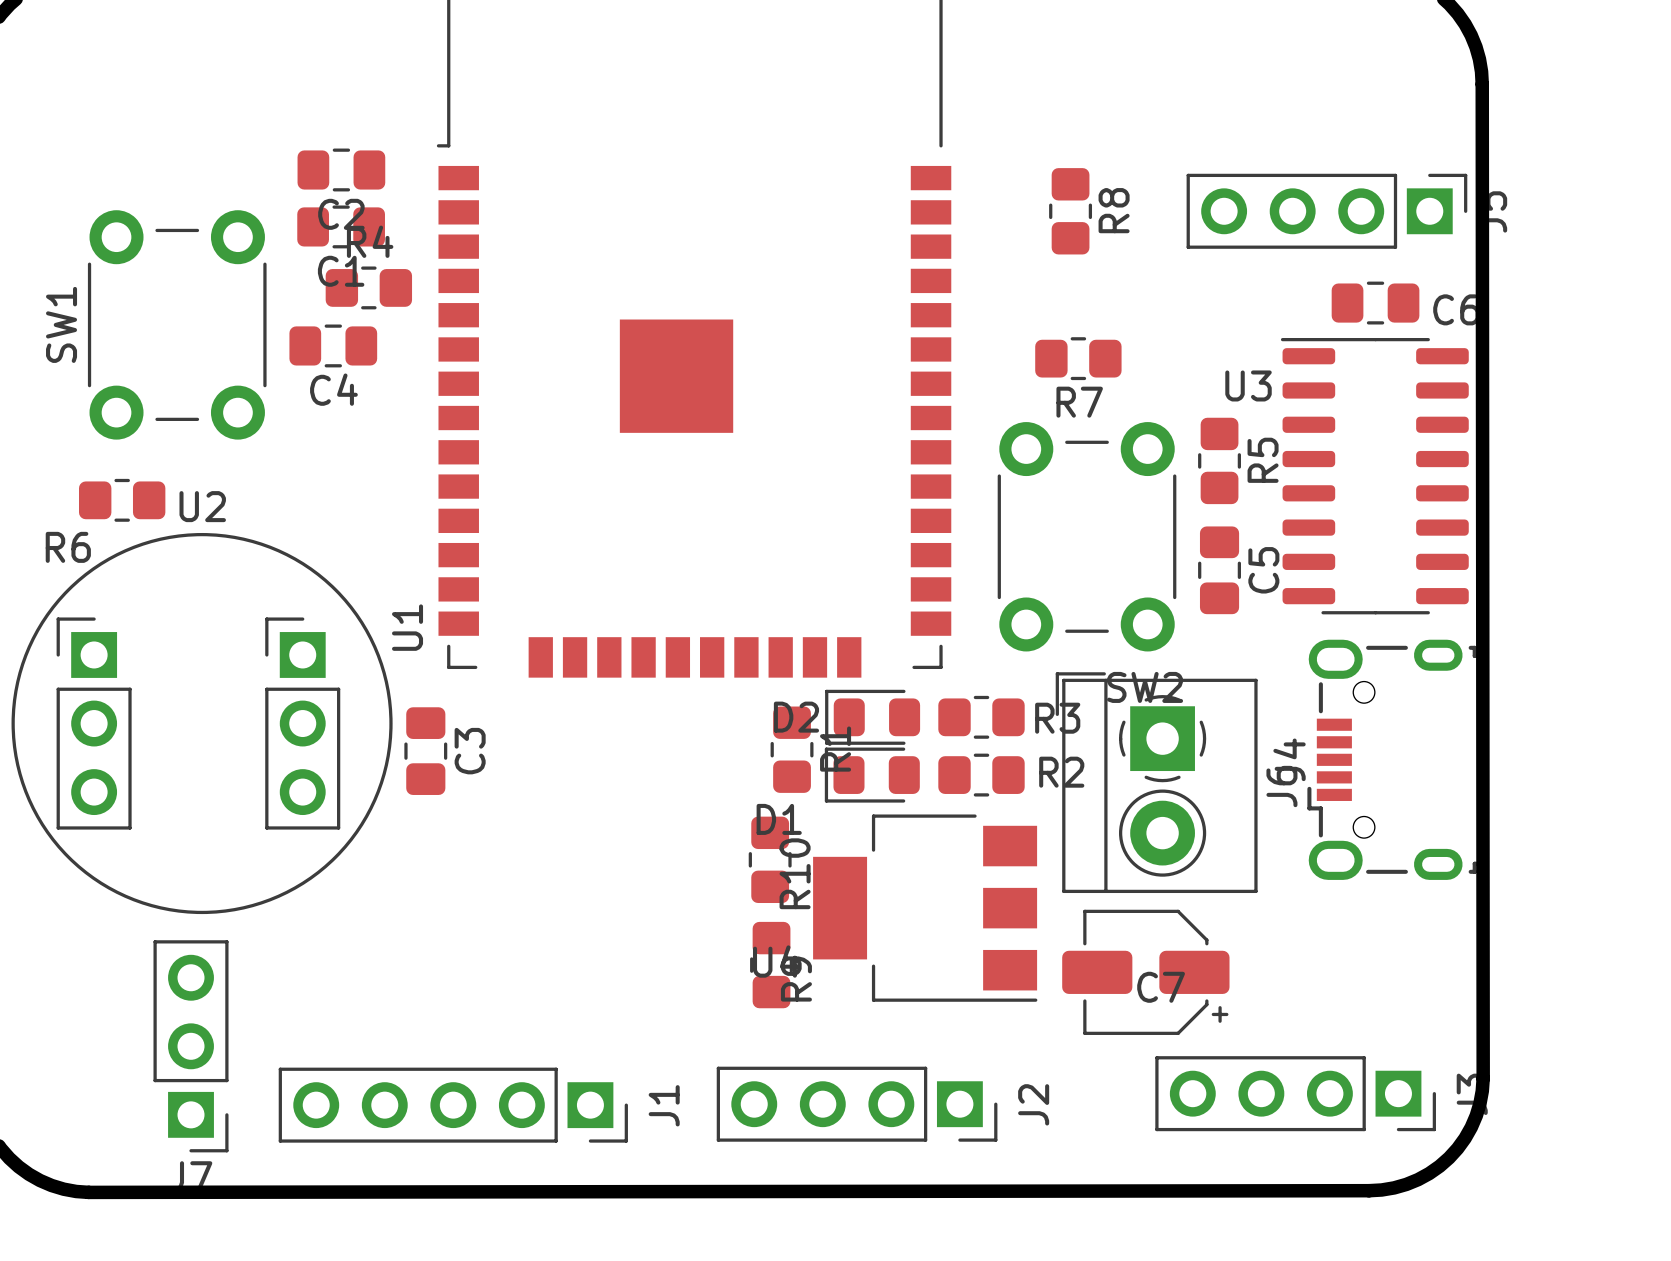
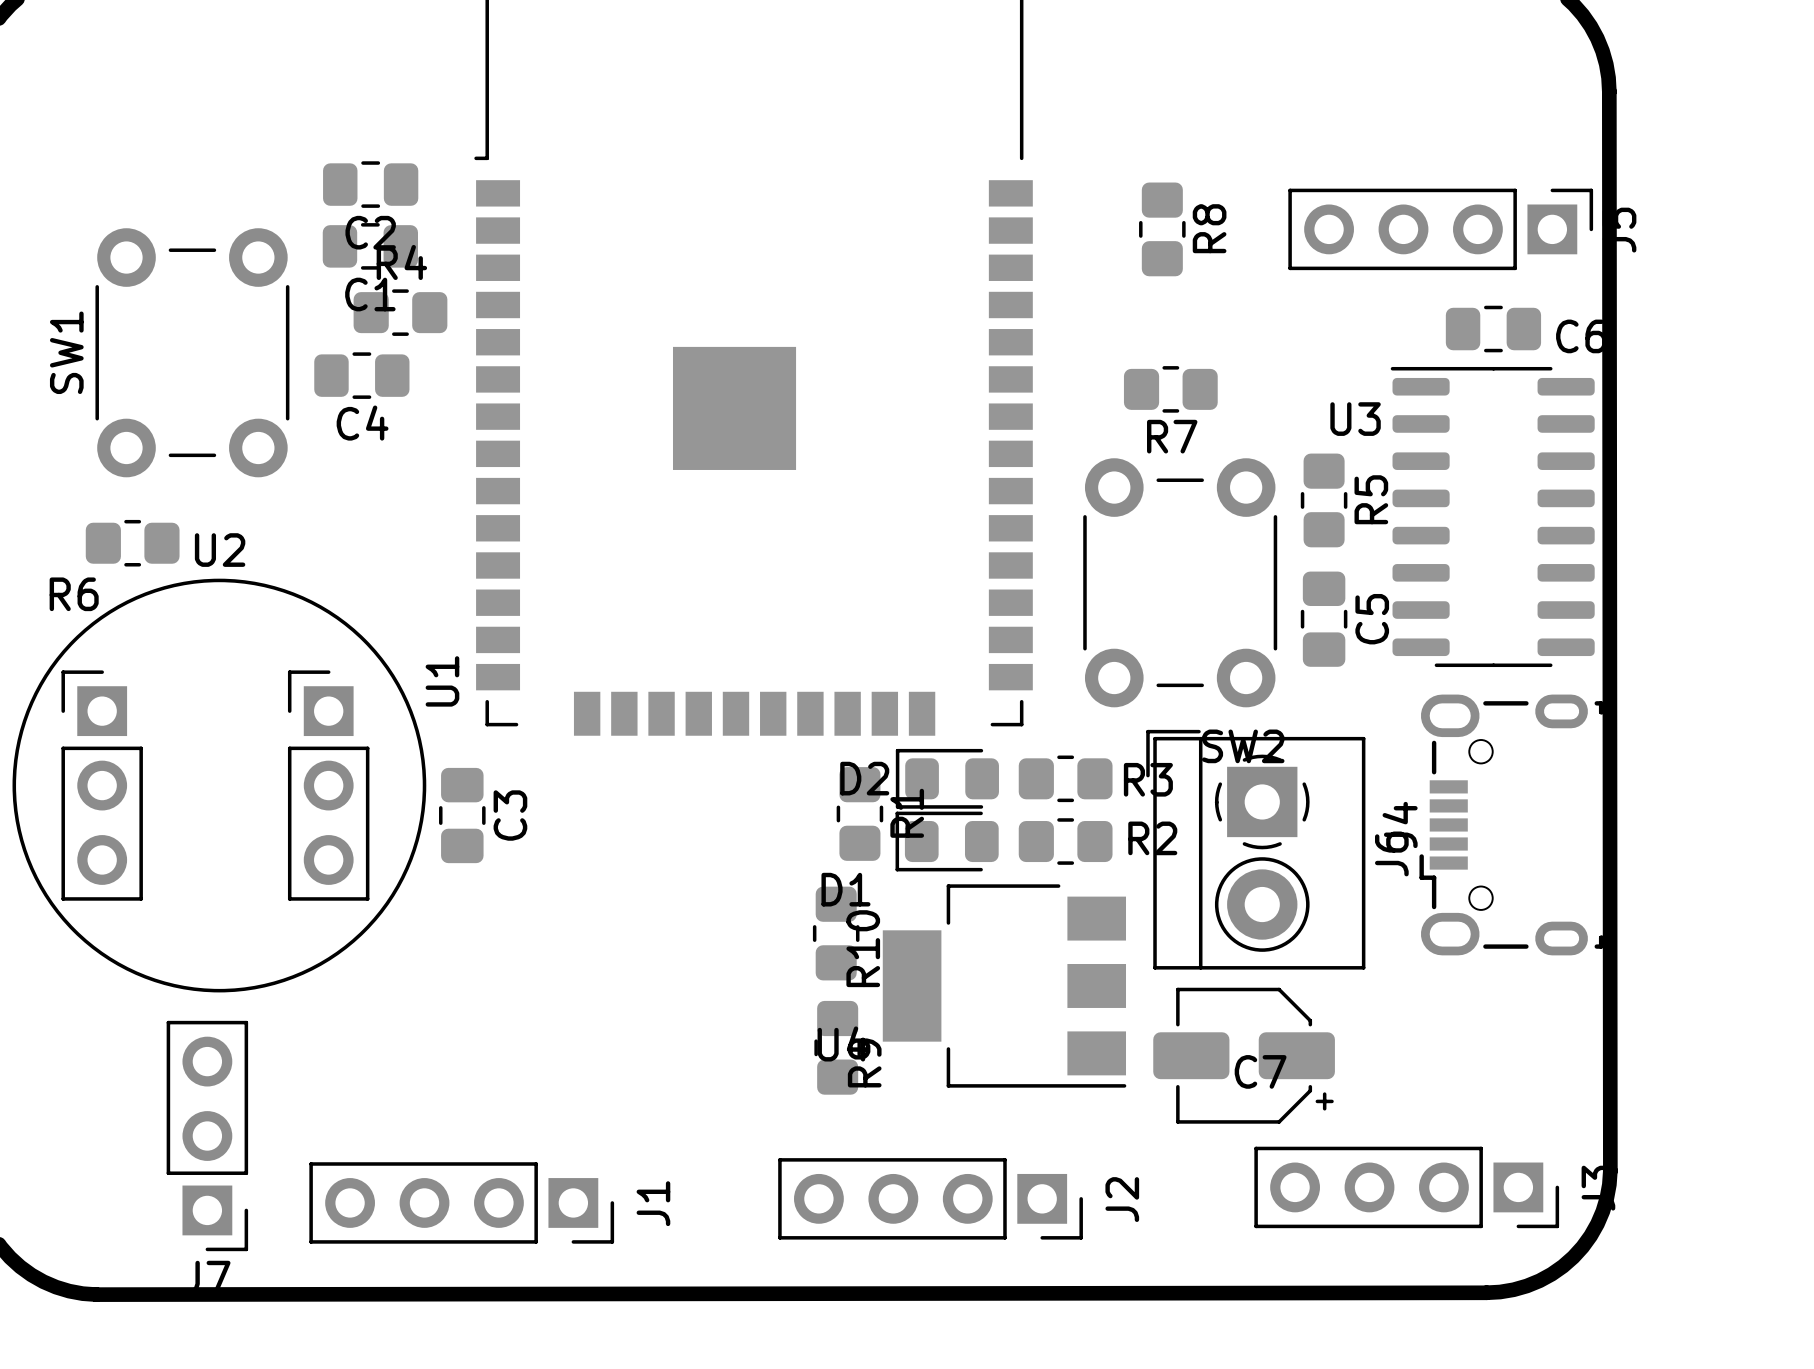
J1 footprint: [278, 1067, 628, 1143] -> [309, 1162, 615, 1244]

